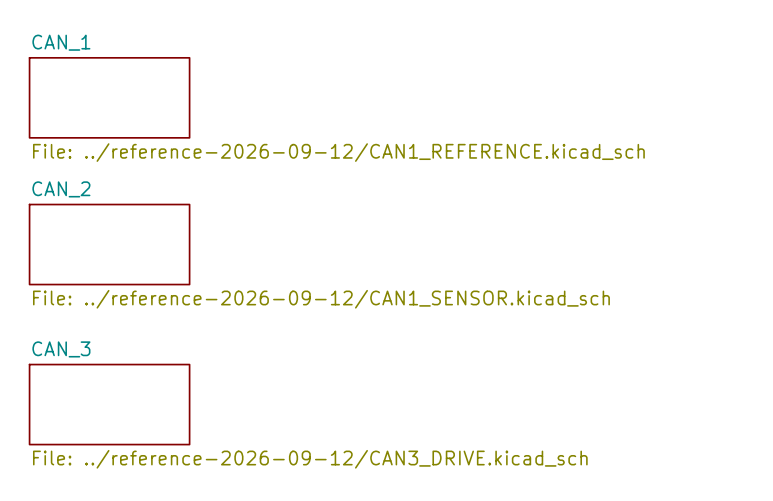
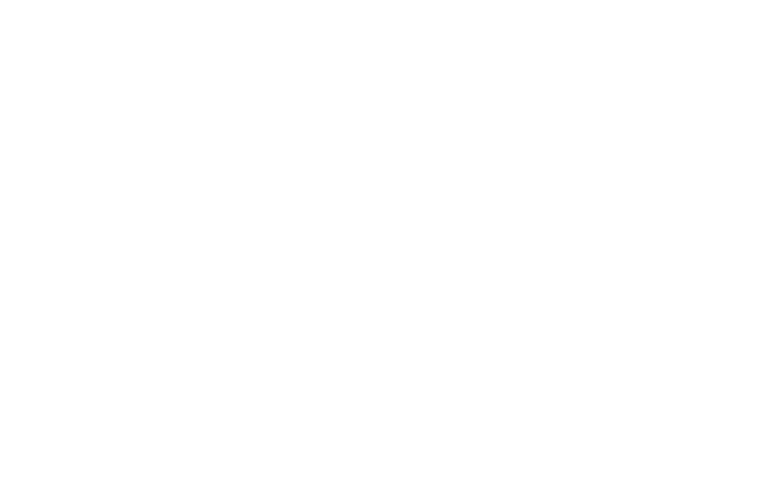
sheet CAN_1: File: ../reference-2026-09-12/CAN1_REFERENCE.kicad_sch (109, 97) -> none
sheet CAN_2: File: ../reference-2026-09-12/CAN1_SENSOR.kicad_sch (109, 244) -> none
sheet CAN_3: File: ../reference-2026-09-12/CAN3_DRIVE.kicad_sch (109, 404) -> none

